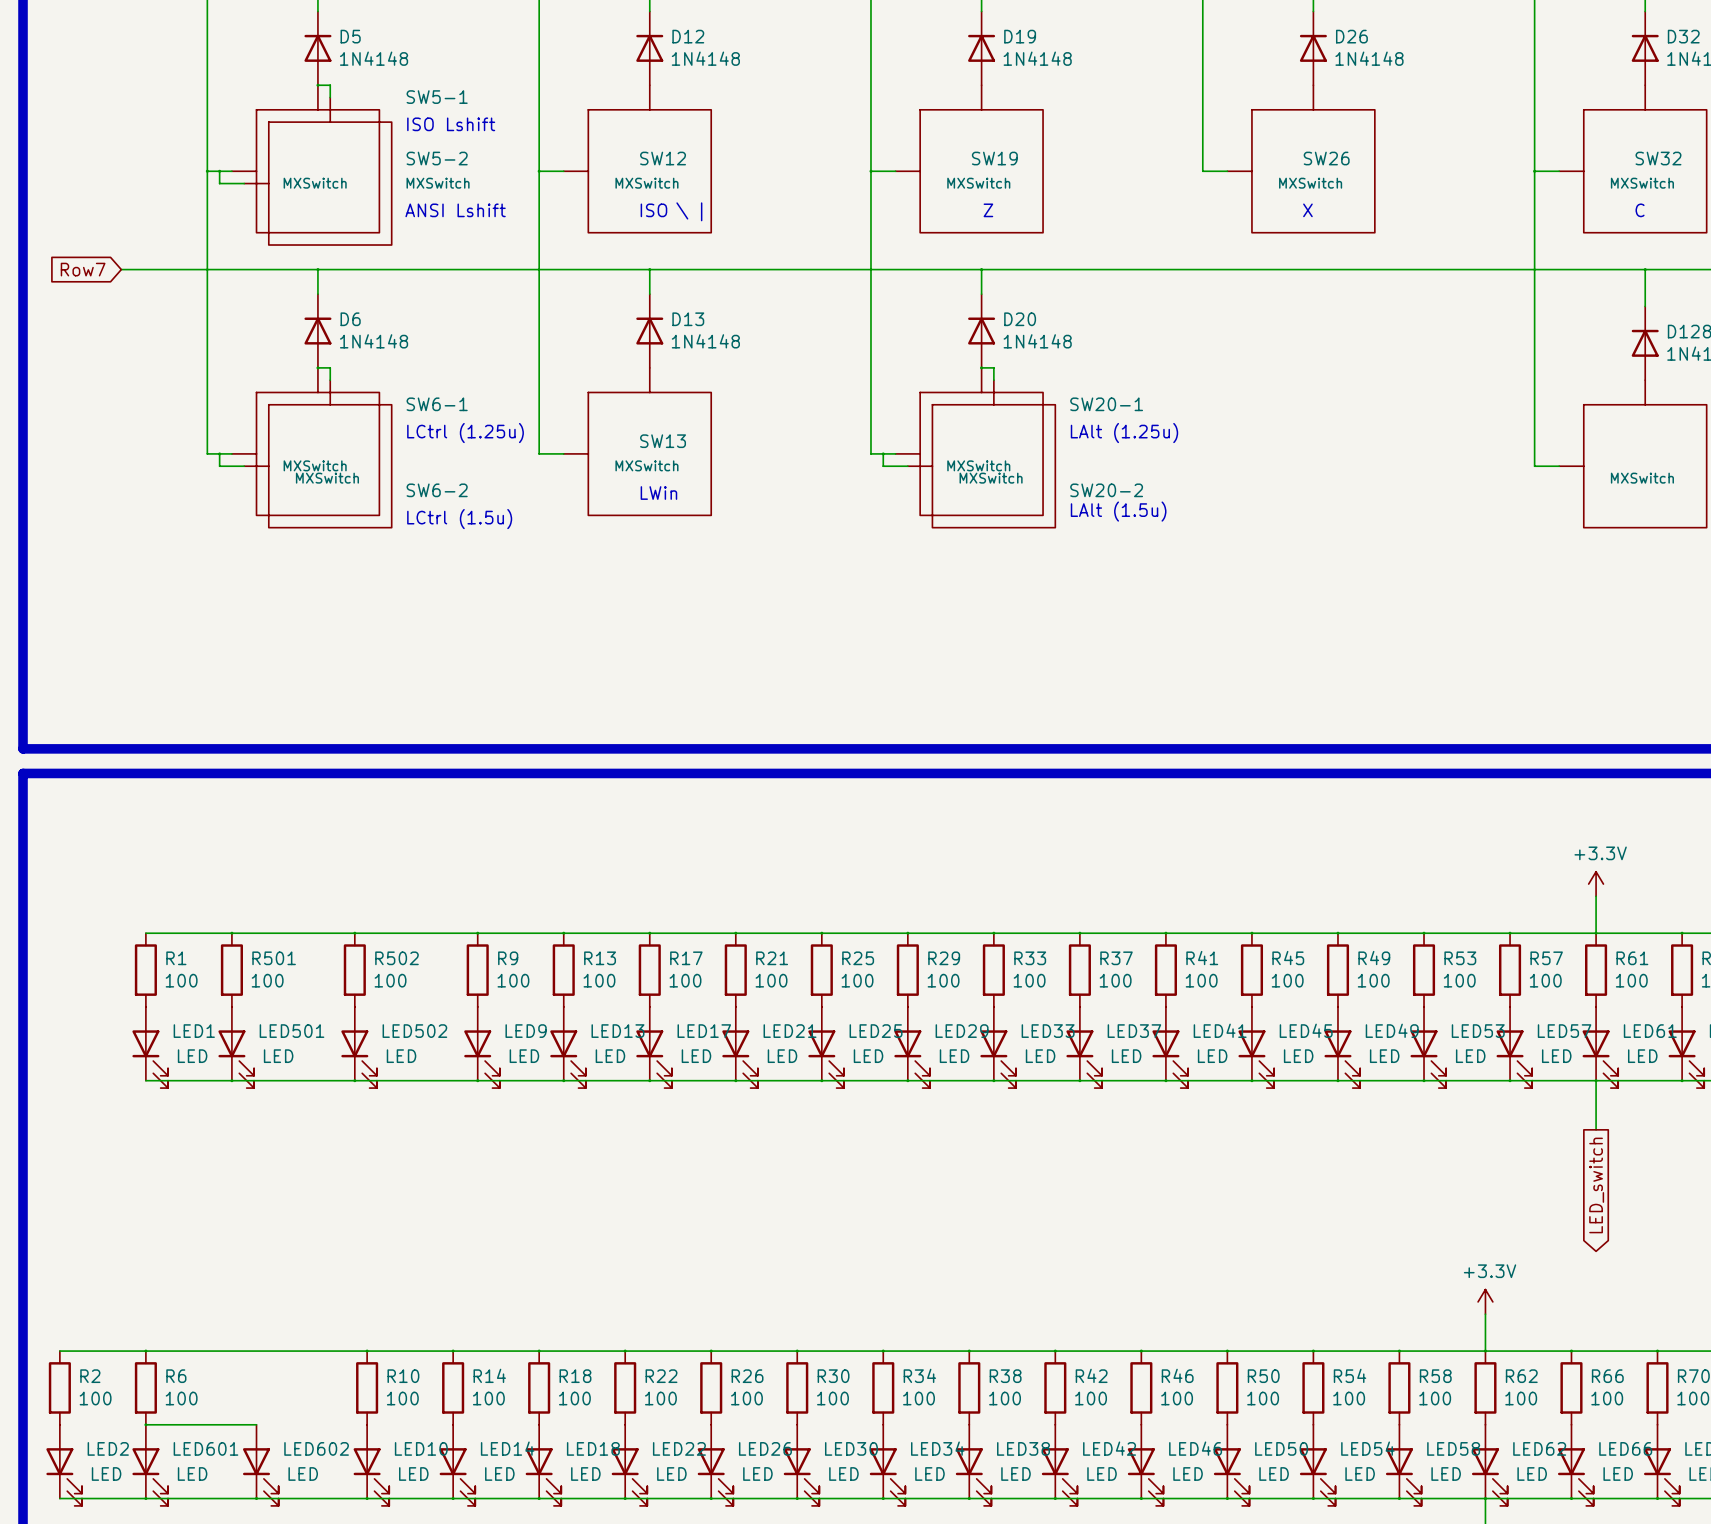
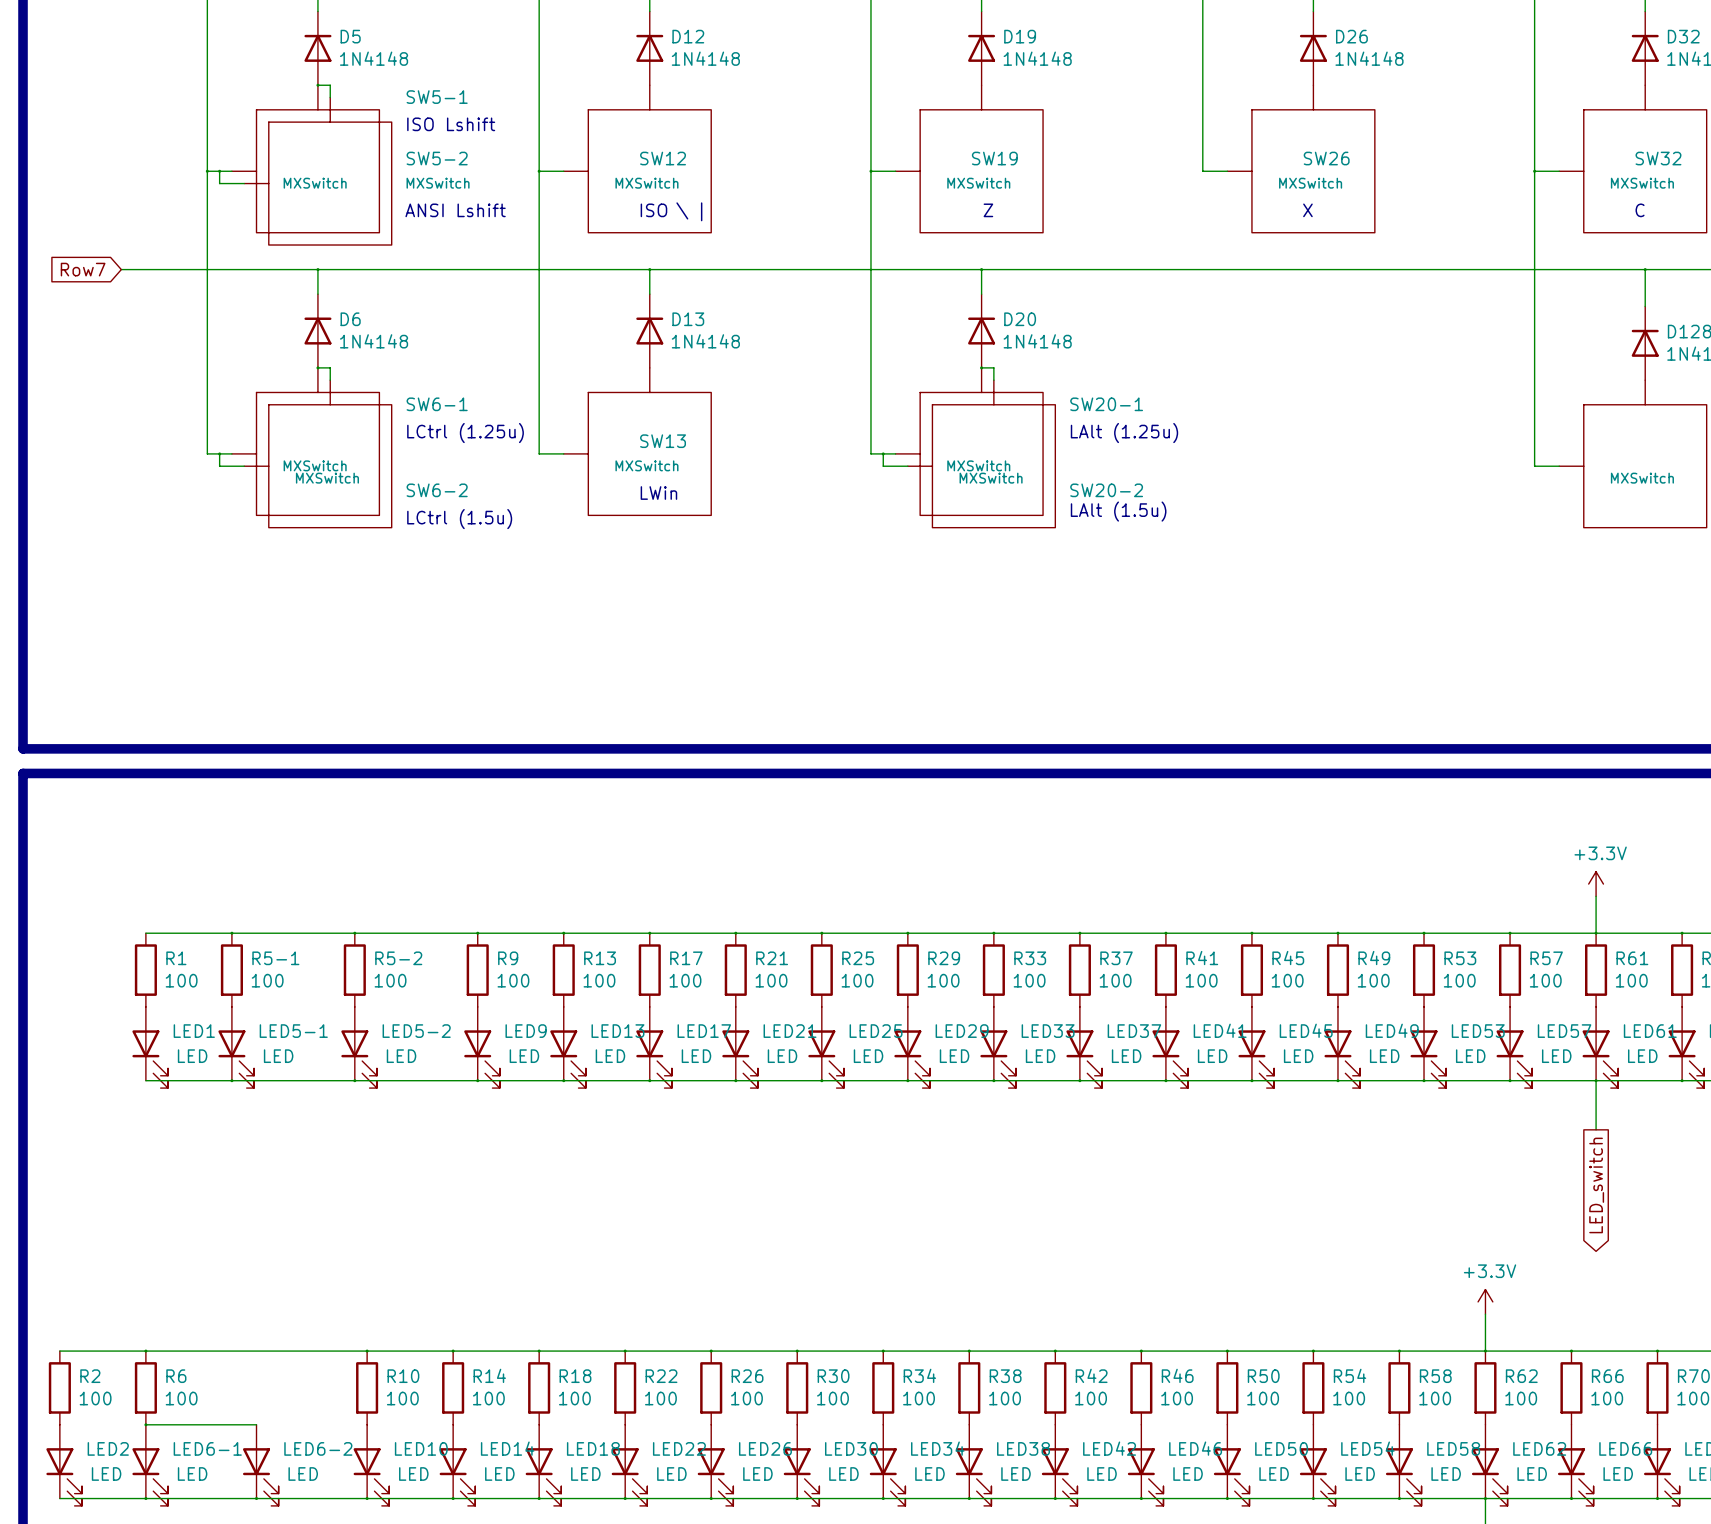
R501 name: R501 (274, 958) -> R5-1 (275, 958)
R502 name: R502 (396, 958) -> R5-2 (398, 958)
LED501 name: LED501 (292, 1031) -> LED5-1 (293, 1031)
LED502 name: LED502 (414, 1031) -> LED5-2 (416, 1031)
LED601 name: LED601 (205, 1448) -> LED6-1 (207, 1448)
LED602 name: LED602 (316, 1448) -> LED6-2 (318, 1448)

